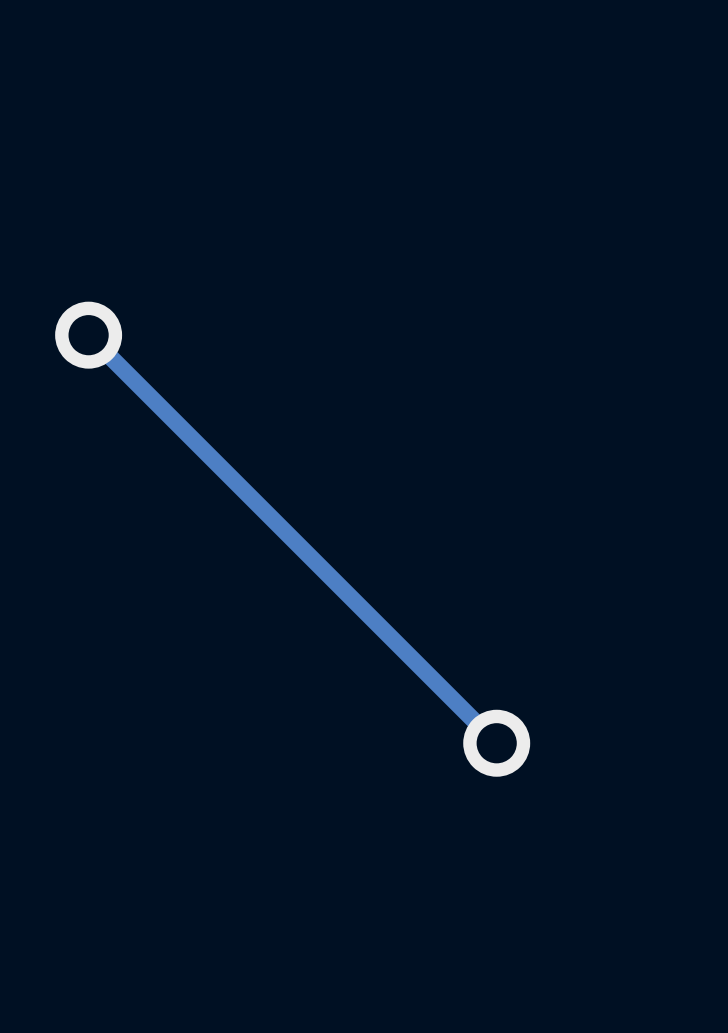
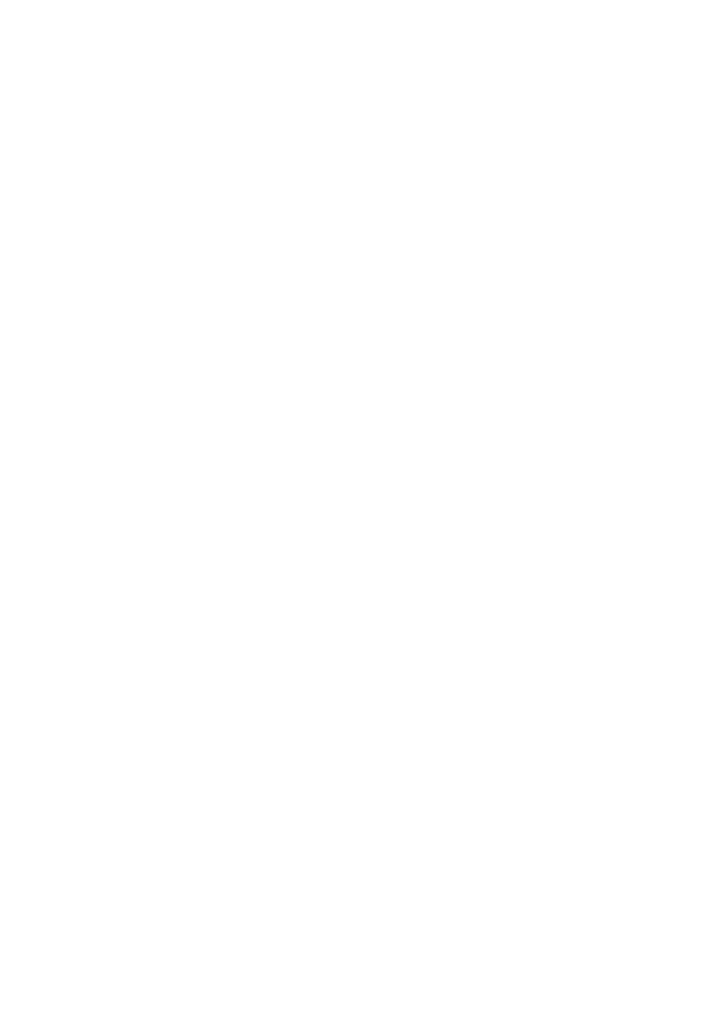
track: (88, 335) (496, 743) -> none
via: (88, 335) -> none
via: (496, 743) -> none

